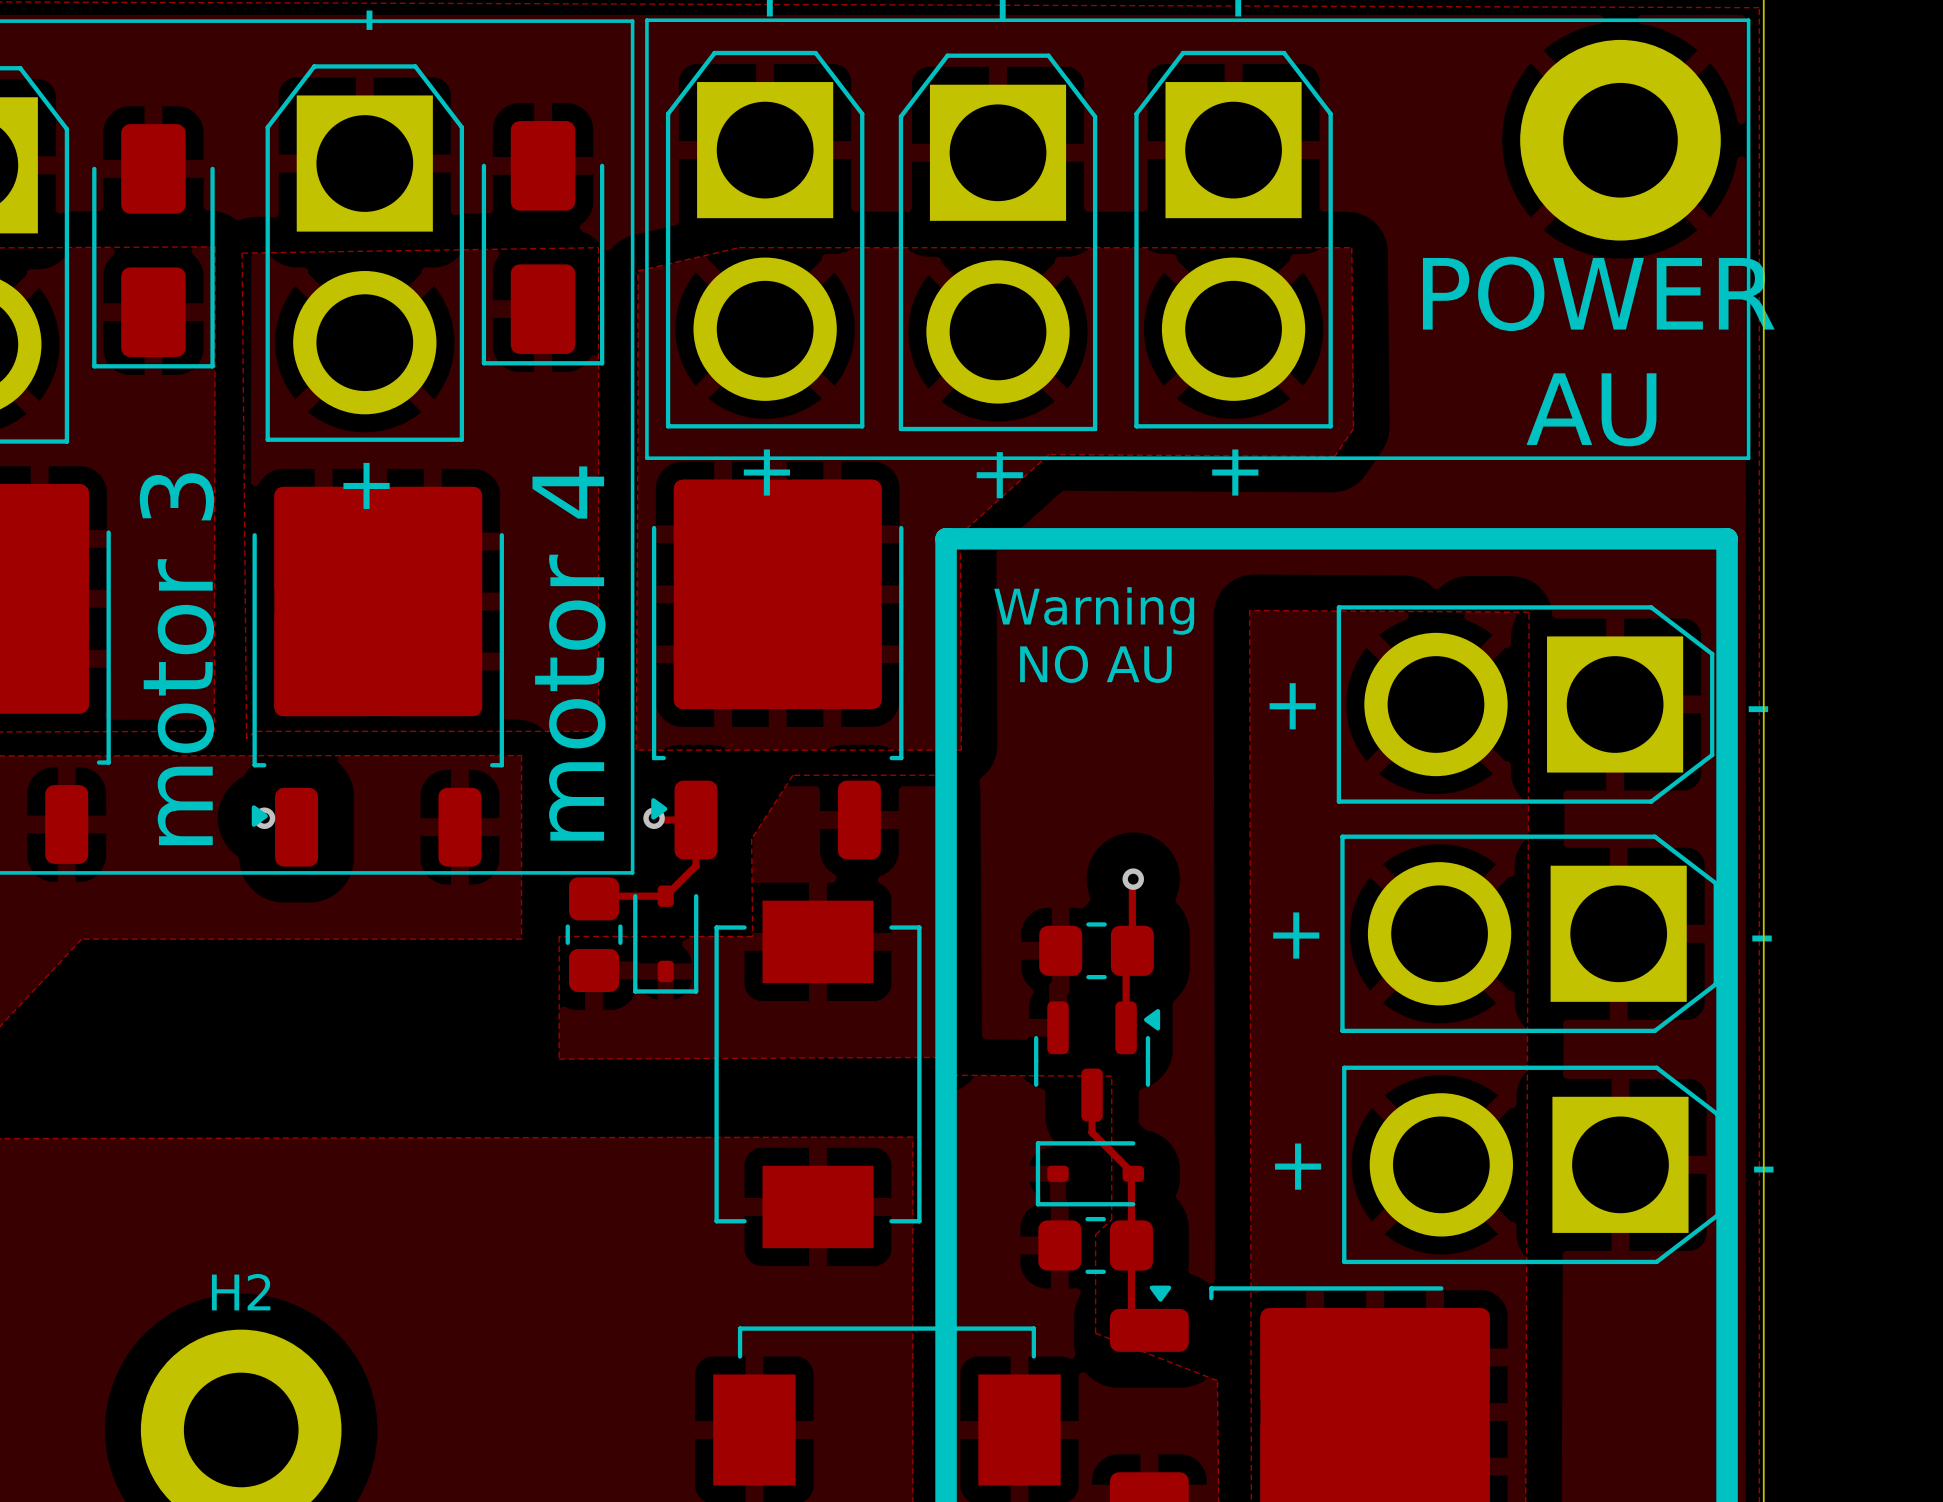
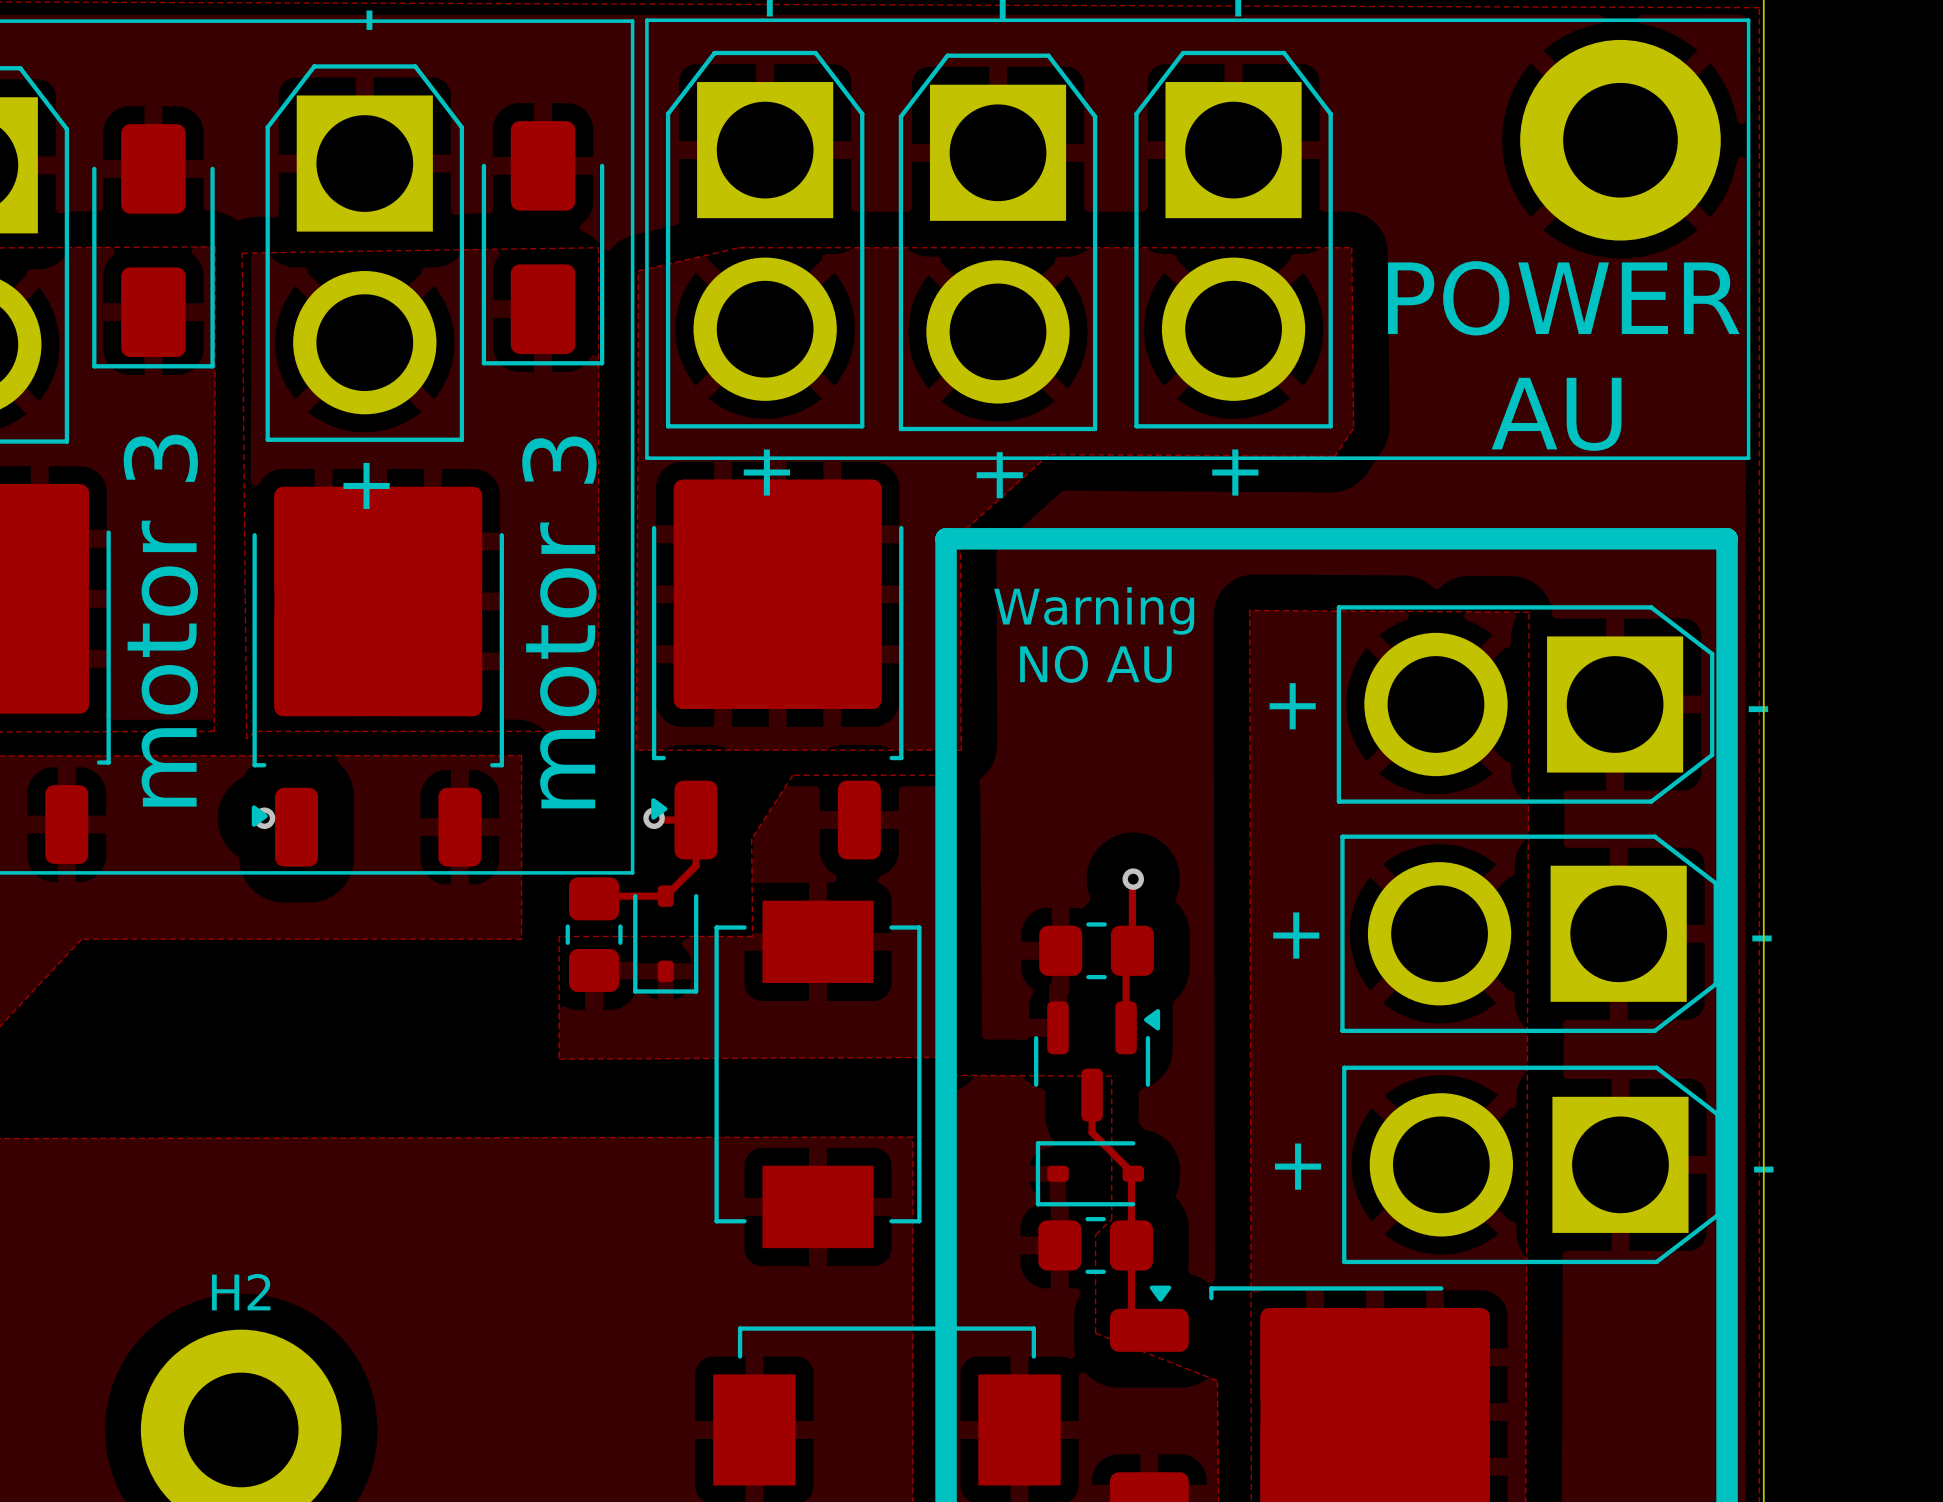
text position: POWER (1598, 293) -> POWER (1563, 298)
text position: AU (1591, 409) -> AU (1556, 414)
text: motor 4 (568, 653) -> motor 3 (559, 622)
text position: motor 3 (176, 659) -> motor 3 (160, 620)

